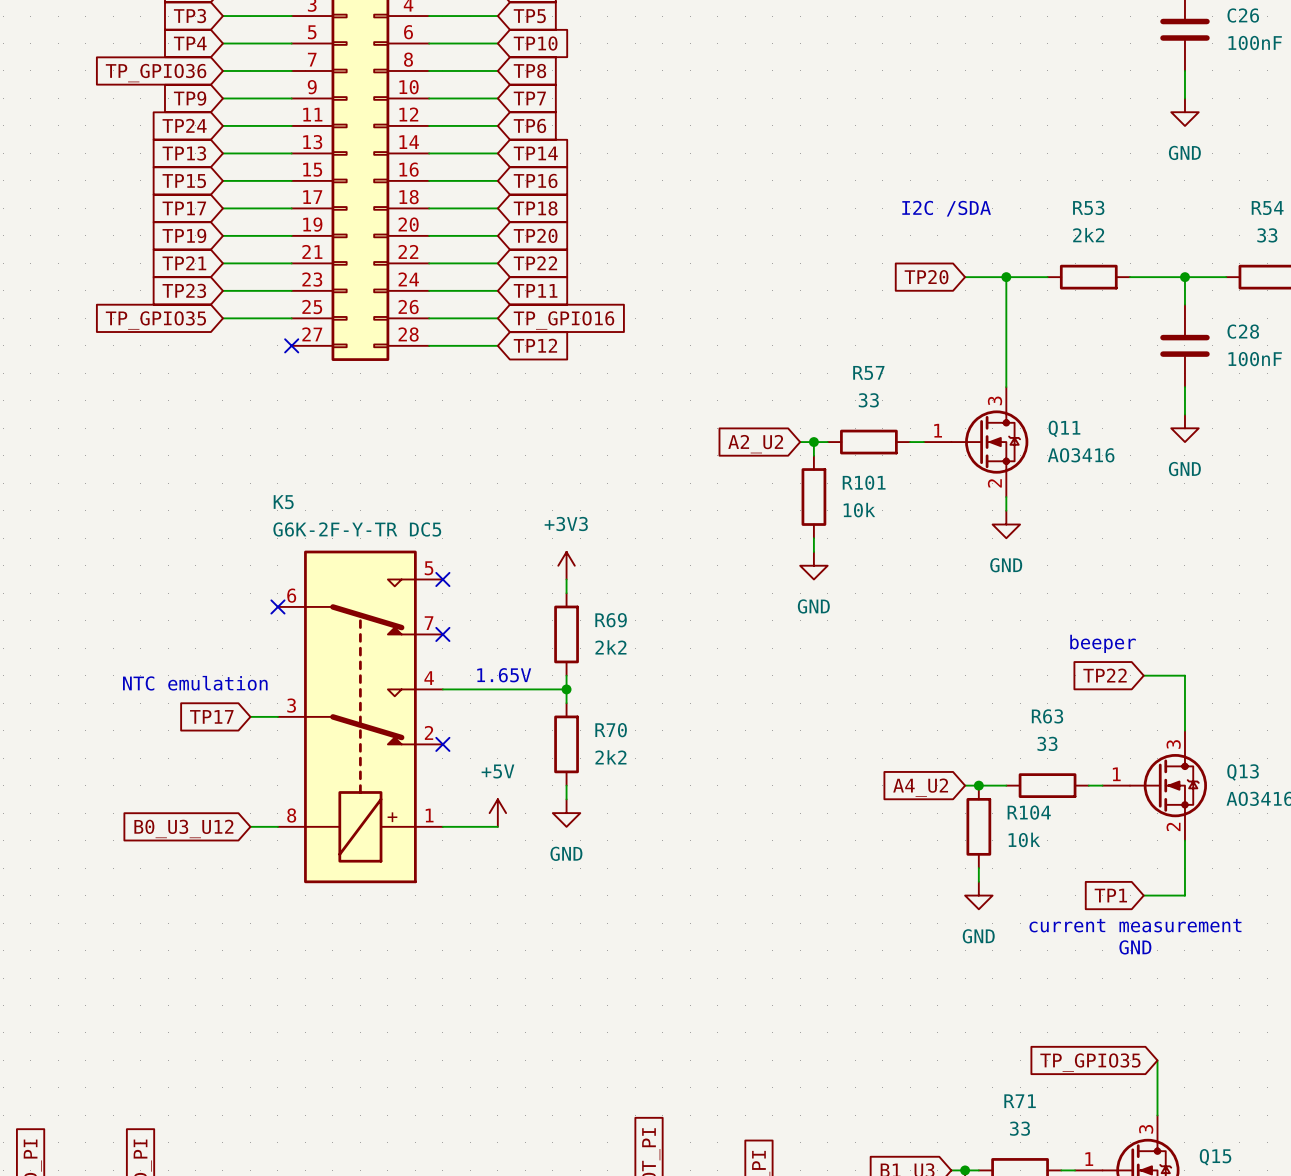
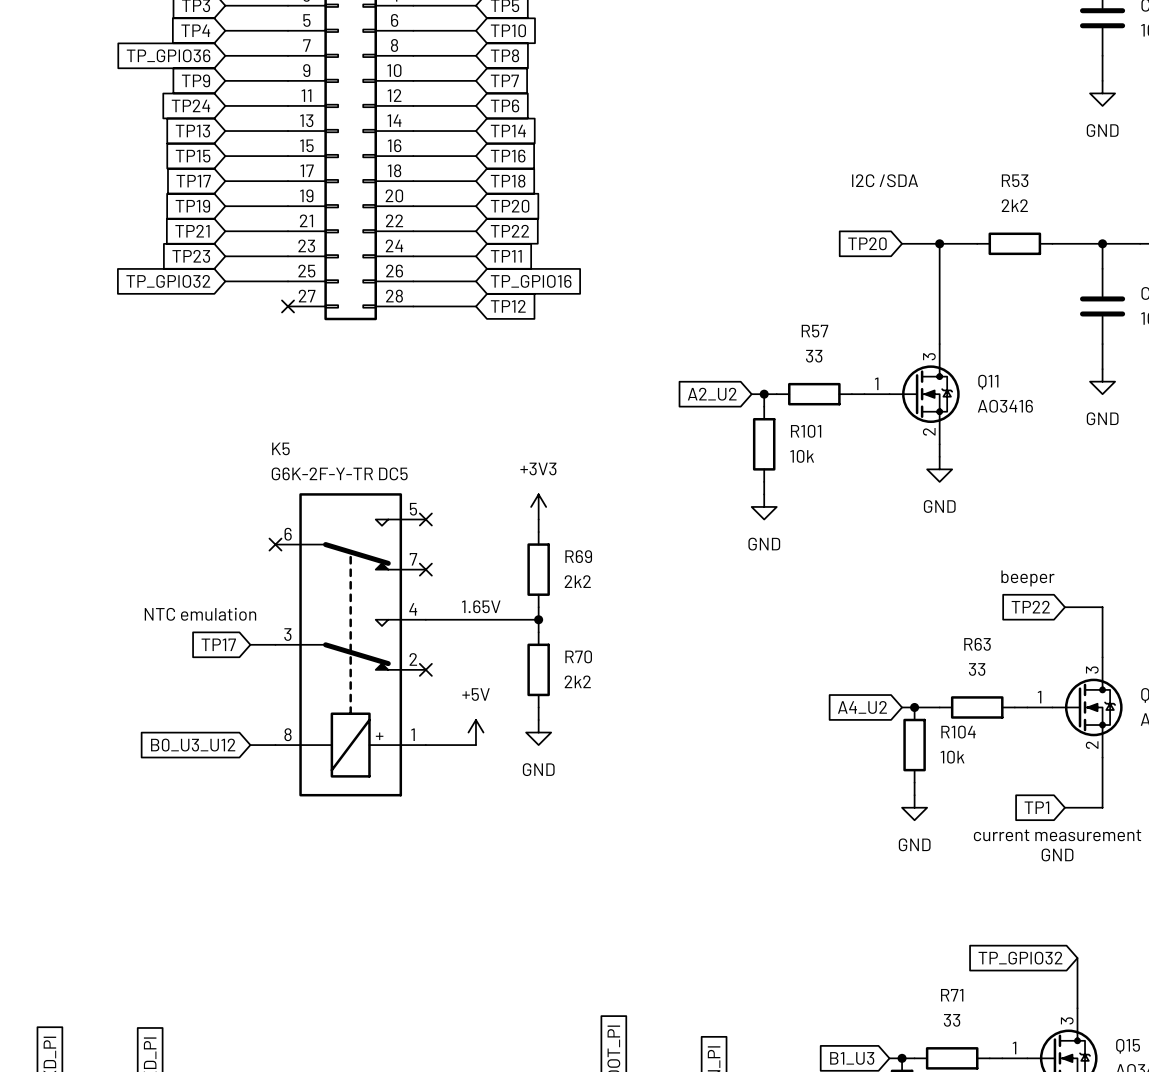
global label: TP_GPIO35 (155, 320) -> TP_GPIO32 (168, 281)
global label: TP_GPIO35 (1090, 1062) -> TP_GPIO32 (1020, 958)

